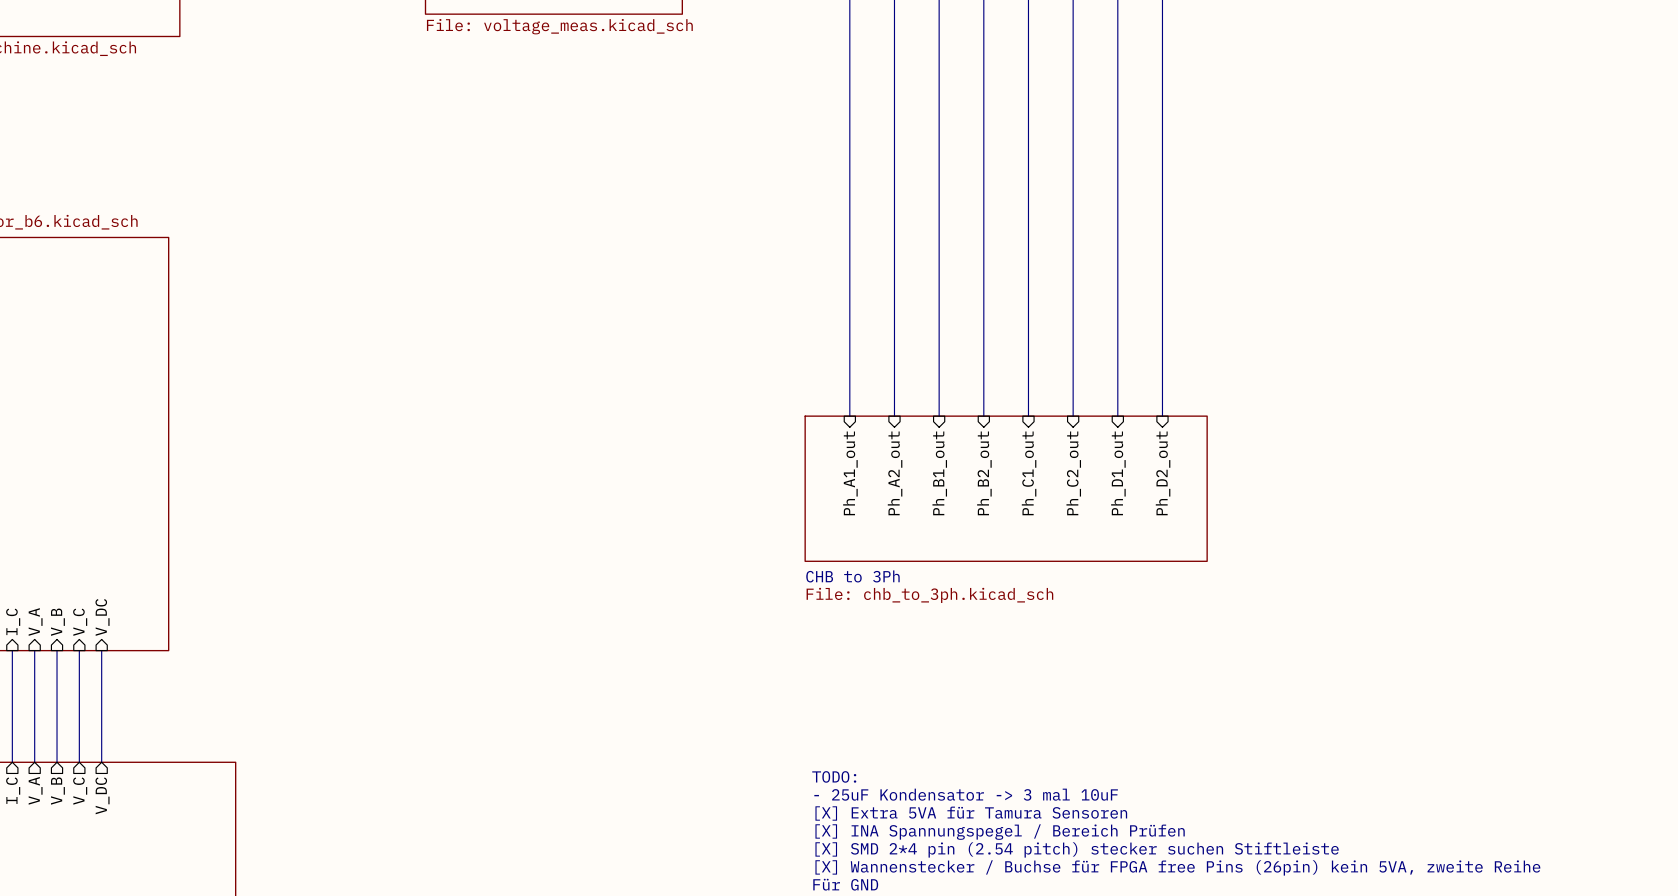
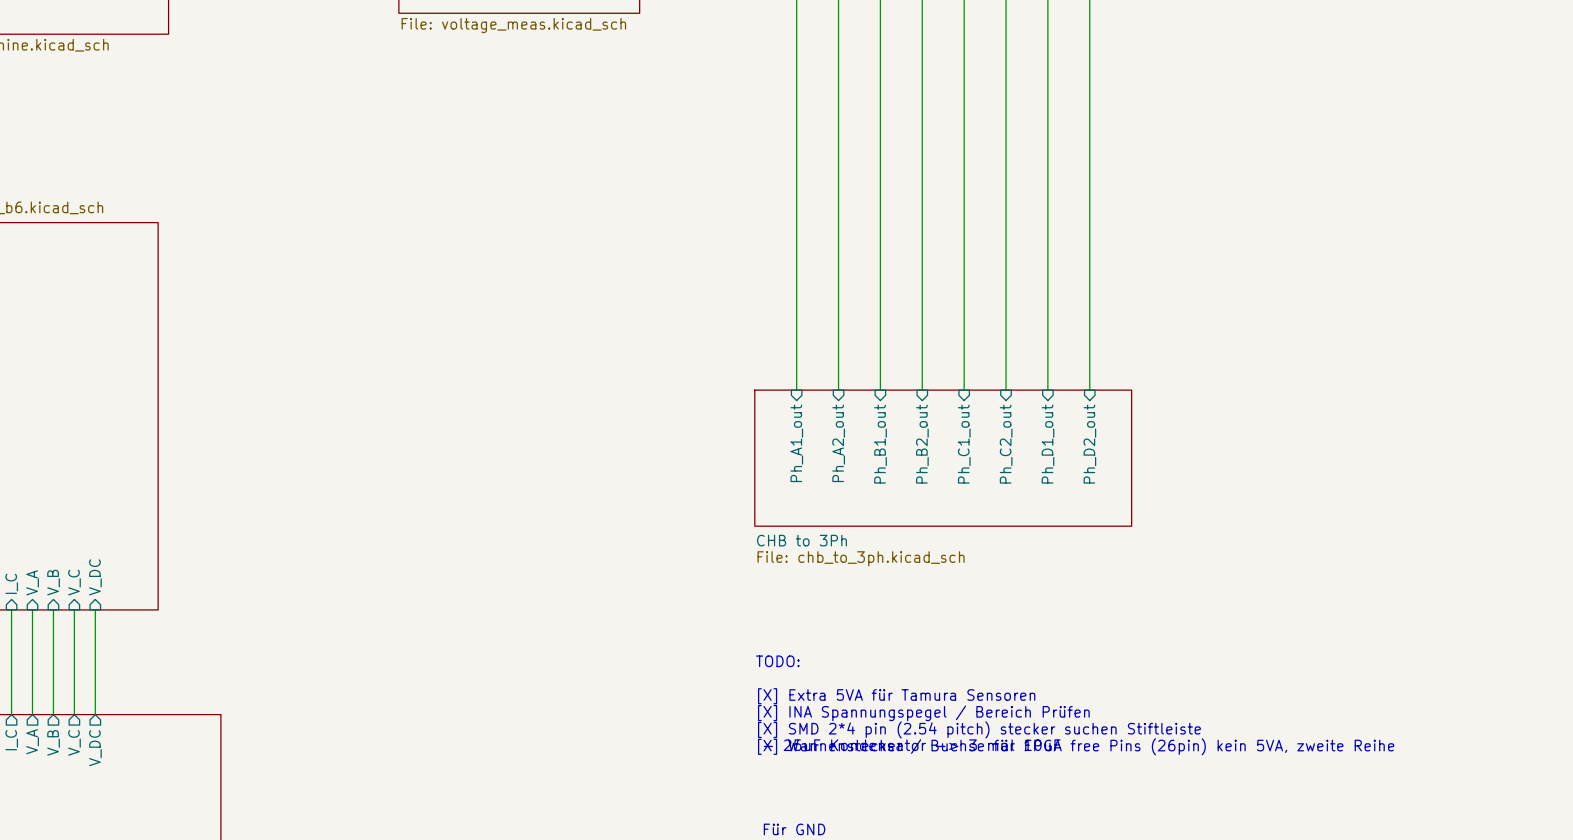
text position: TODO: (834, 776) -> TODO: (777, 661)
text position: [X] Extra 5VA für Tamura Sensoren (971, 813) -> [X] Extra 5VA für Tamura Sensoren (896, 696)
text position: [X] INA Spannungspegel / Bereich Prüfen (1000, 832) -> [X] INA Spannungspegel / Bereich Prüfen (923, 713)
text position: [X] SMD 2*4 pin (2.54 pitch) stecker suchen Stiftleiste (1077, 849) -> [X] SMD 2*4 pin (2.54 pitch) stecker suchen Stiftleiste (979, 729)
text position: [X] Wannenstecker / Buchse für FPGA free Pins (26pin) kein 5VA, zweite Reihe (1177, 867) -> [X] Wannenstecker / Buchse für FPGA free Pins (26pin) kein 5VA, zweite Reihe (1076, 746)

